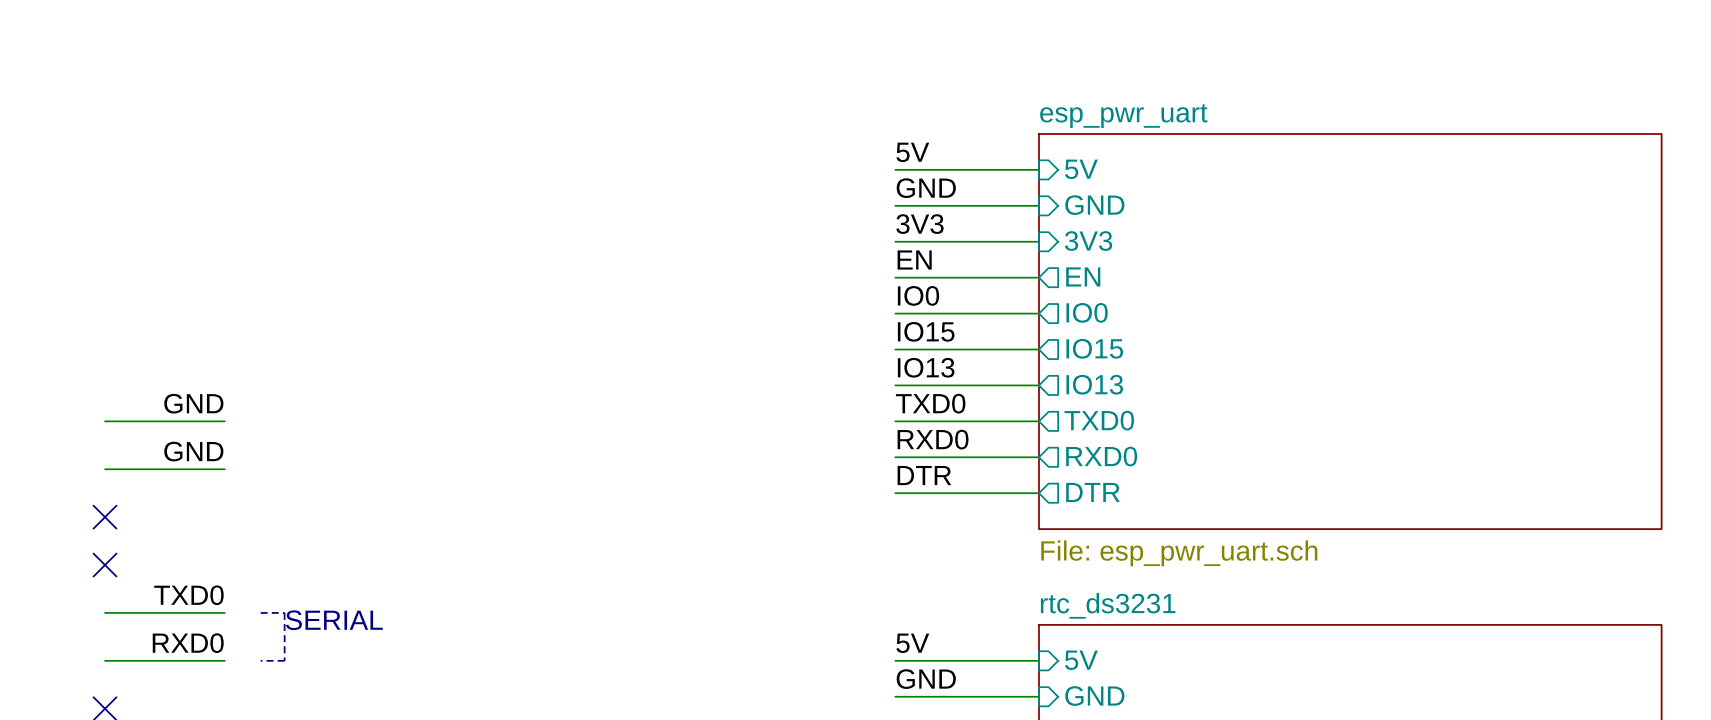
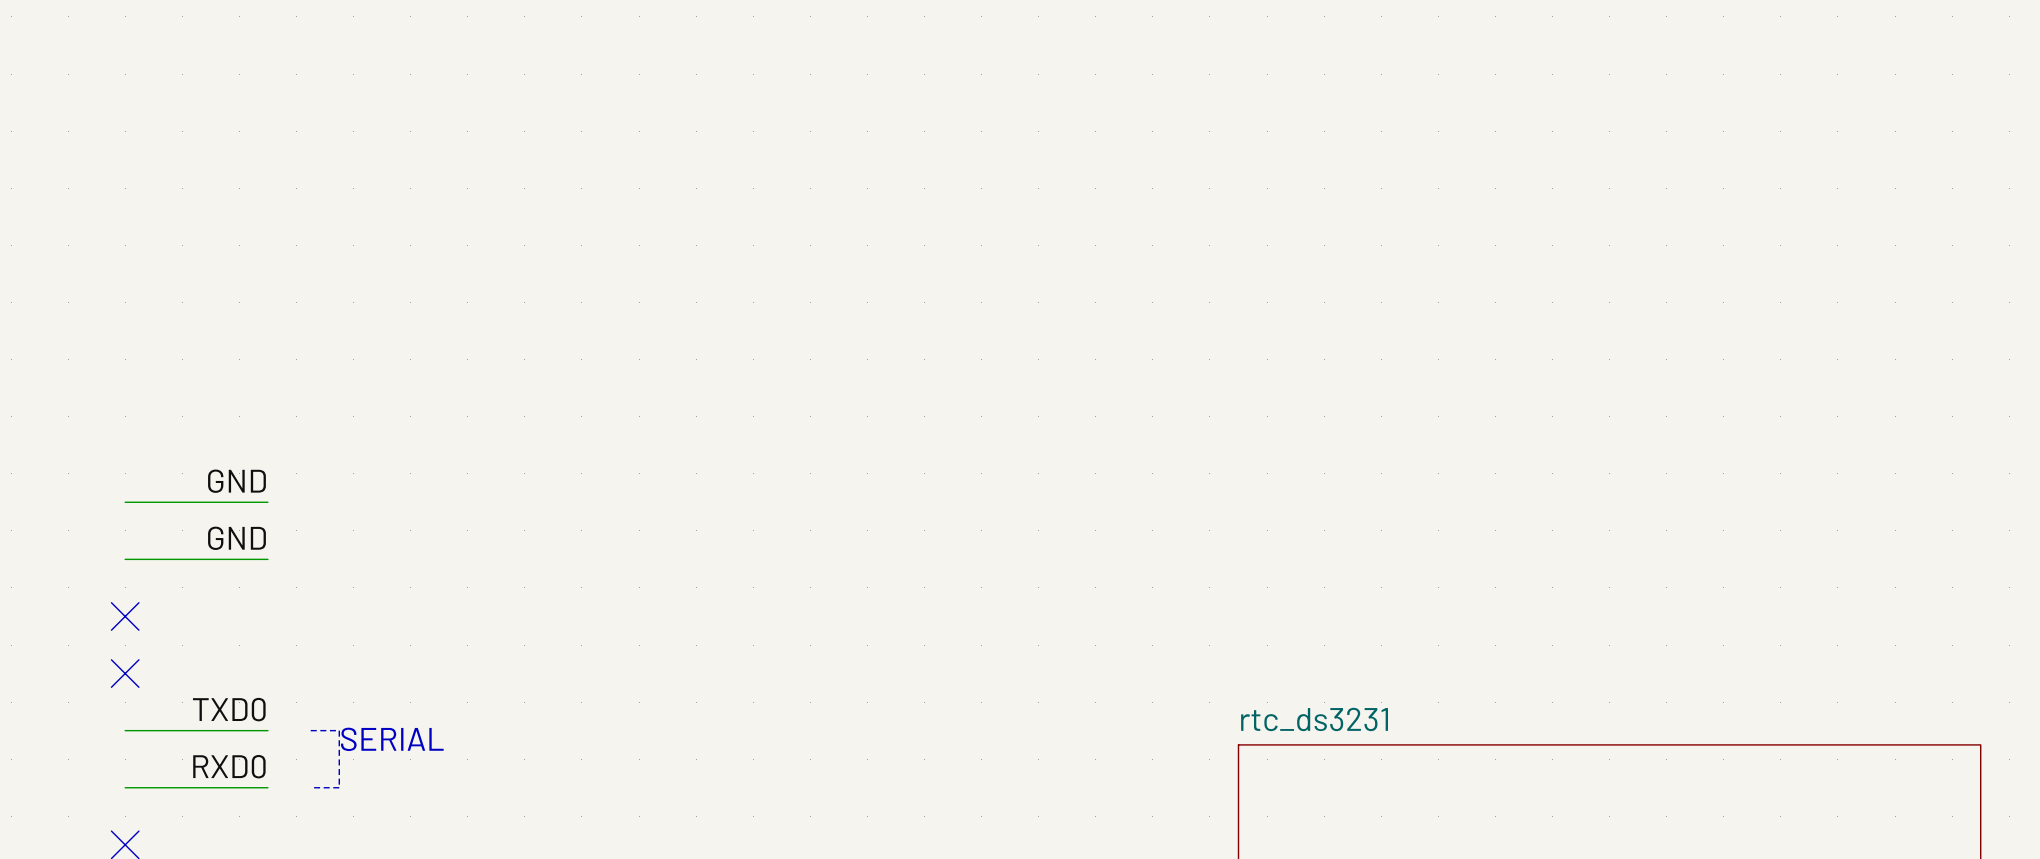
label: 5V (912, 152) -> none
wire: (895, 169) (1038, 169) -> none
sheet pin: 5V (1081, 169) -> none
label: GND (926, 188) -> none
wire: (895, 205) (1038, 205) -> none
sheet pin: GND (1094, 205) -> none
label: 3V3 (919, 224) -> none
wire: (895, 241) (1038, 241) -> none
sheet pin: 3V3 (1088, 241) -> none
label: EN (914, 260) -> none
sheet pin: EN (1083, 276) -> none
wire: (895, 277) (1038, 277) -> none
label: IO0 (918, 295) -> none
sheet pin: IO0 (1087, 312) -> none
wire: (895, 313) (1038, 313) -> none
label: IO15 (926, 331) -> none
sheet esp_pwr_uart: File: esp_pwr_uart.sch (1350, 331) -> none
sheet pin: IO15 (1094, 348) -> none
wire: (895, 349) (1038, 349) -> none
label: IO13 (926, 367) -> none
sheet pin: IO13 (1094, 384) -> none
wire: (895, 385) (1038, 385) -> none
label: TXD0 (930, 403) -> none
sheet pin: TXD0 (1099, 420) -> none
wire: (895, 421) (1038, 421) -> none
label: RXD0 (933, 439) -> none
sheet pin: RXD0 (1101, 456) -> none
wire: (895, 457) (1038, 457) -> none
label: DTR (924, 475) -> none
sheet pin: DTR (1092, 492) -> none
wire: (895, 493) (1038, 493) -> none
label: 5V (912, 643) -> none
wire: (895, 660) (1038, 660) -> none
sheet pin: 5V (1081, 660) -> none
label: GND (926, 679) -> none
wire: (895, 696) (1038, 696) -> none
sheet pin: GND (1094, 696) -> none

